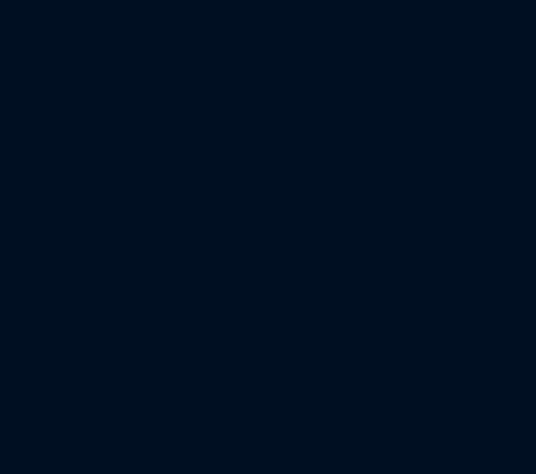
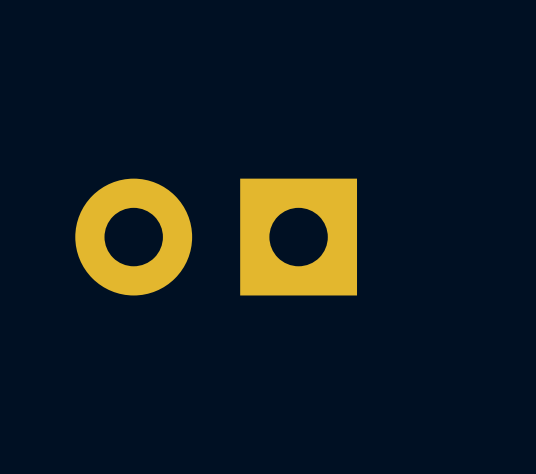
part: none -> (216, 237)

